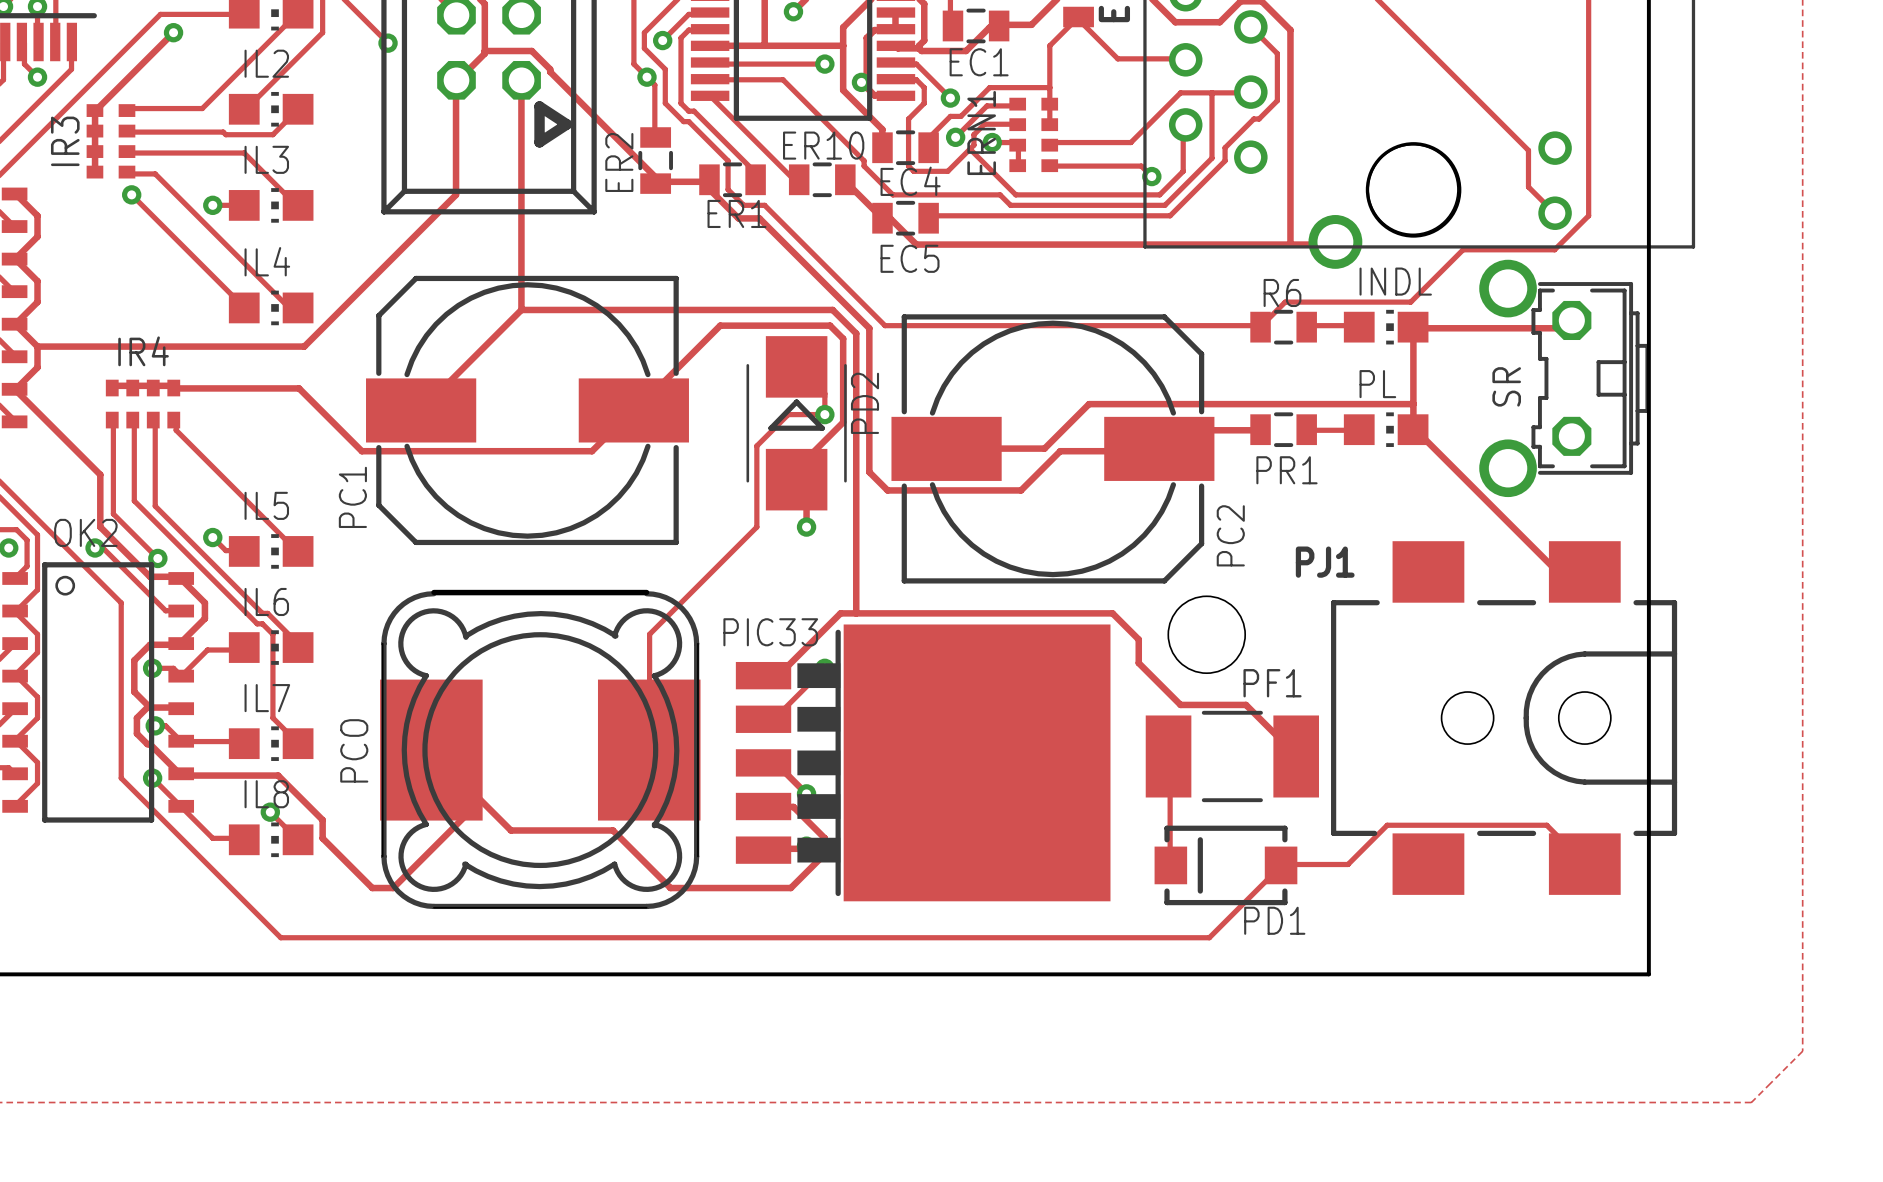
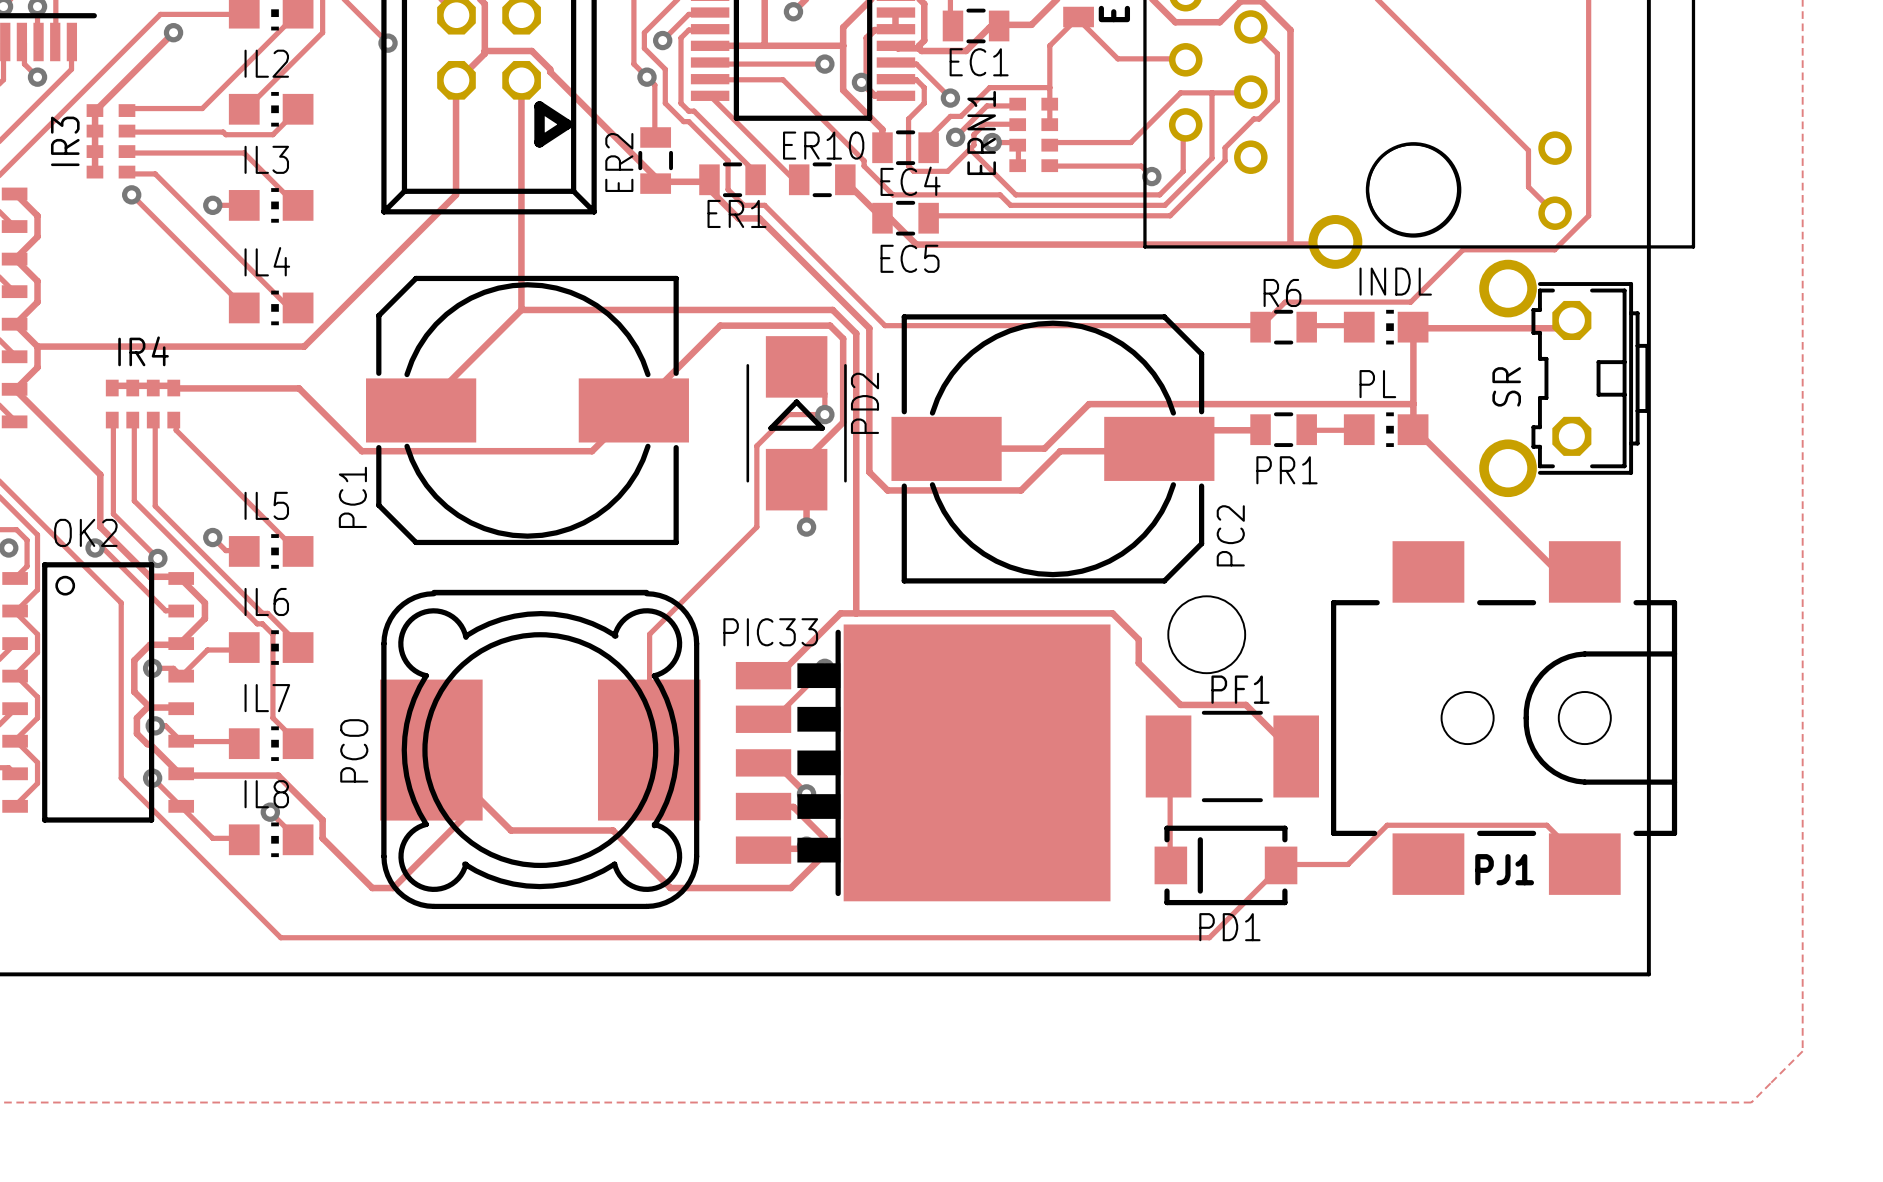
PJ1 name position: PJ1 (1325, 562) -> PJ1 (1504, 869)
PF1 name position: PF1 (1272, 683) -> PF1 (1240, 689)
PD1 name position: PD1 (1274, 920) -> PD1 (1229, 927)

